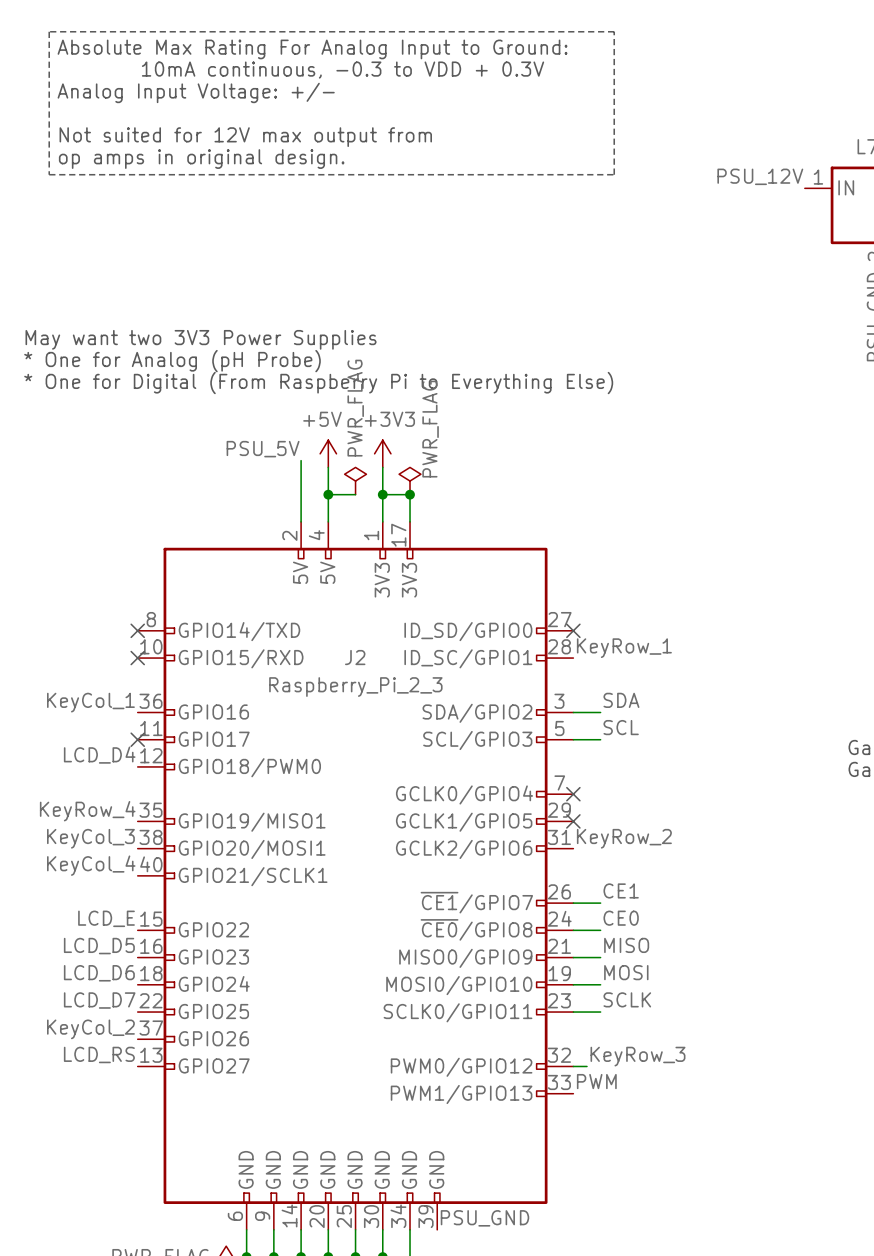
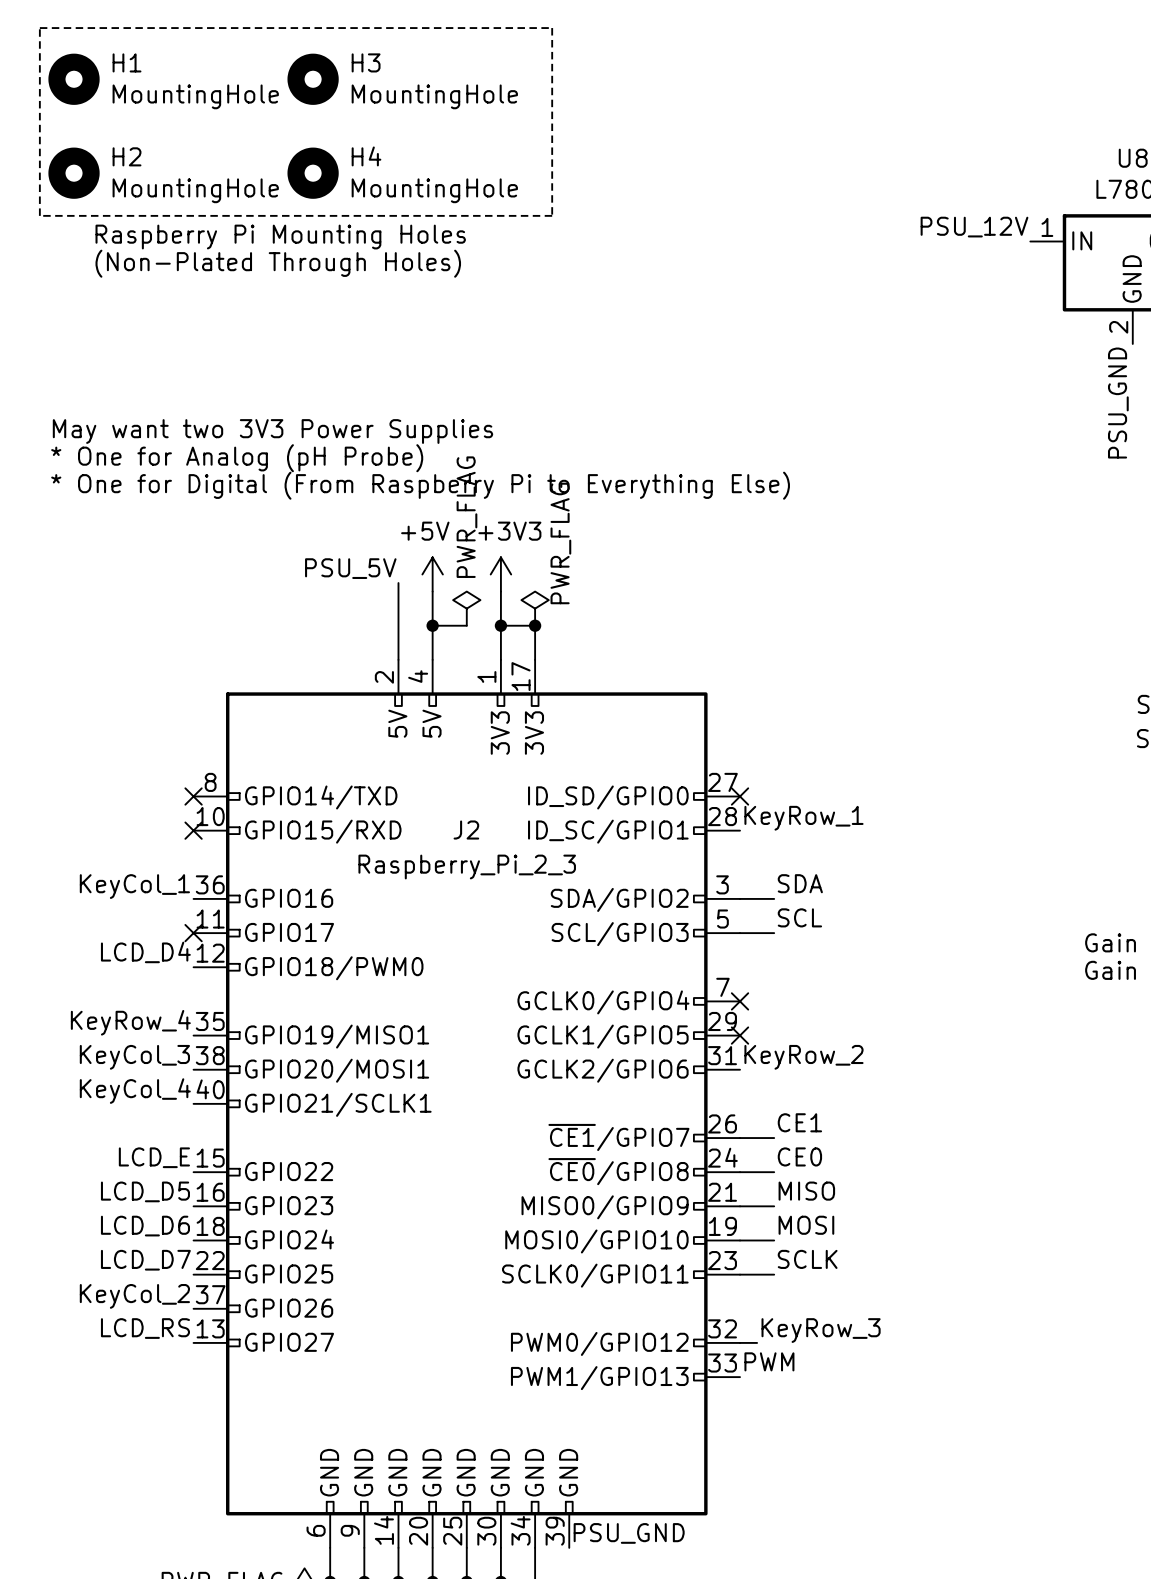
line: (49, 31) (49, 174) (614, 174) (614, 31) (49, 31) -> (39, 28) (39, 215) (552, 215) (552, 28) (39, 28)
text: Absolute Max Rating For Analog Input to Ground: (312, 49) -> none
H1: none -> MountingHole (74, 79)
H3: none -> MountingHole (313, 79)
text: 10mA continuous, -0.3 to VDD + 0.3V (343, 70) -> none
text: Analog Input Voltage: +/- (196, 92) -> none
H2: none -> MountingHole (74, 173)
H4: none -> MountingHole (313, 173)
text: Not suited for 12V max output from (245, 137) -> none
text: op amps in original design. (201, 159) -> none
text: none -> Raspberry Pi Mounting Holes (280, 237)
text: none -> (Non-Plated Through Holes) (278, 263)

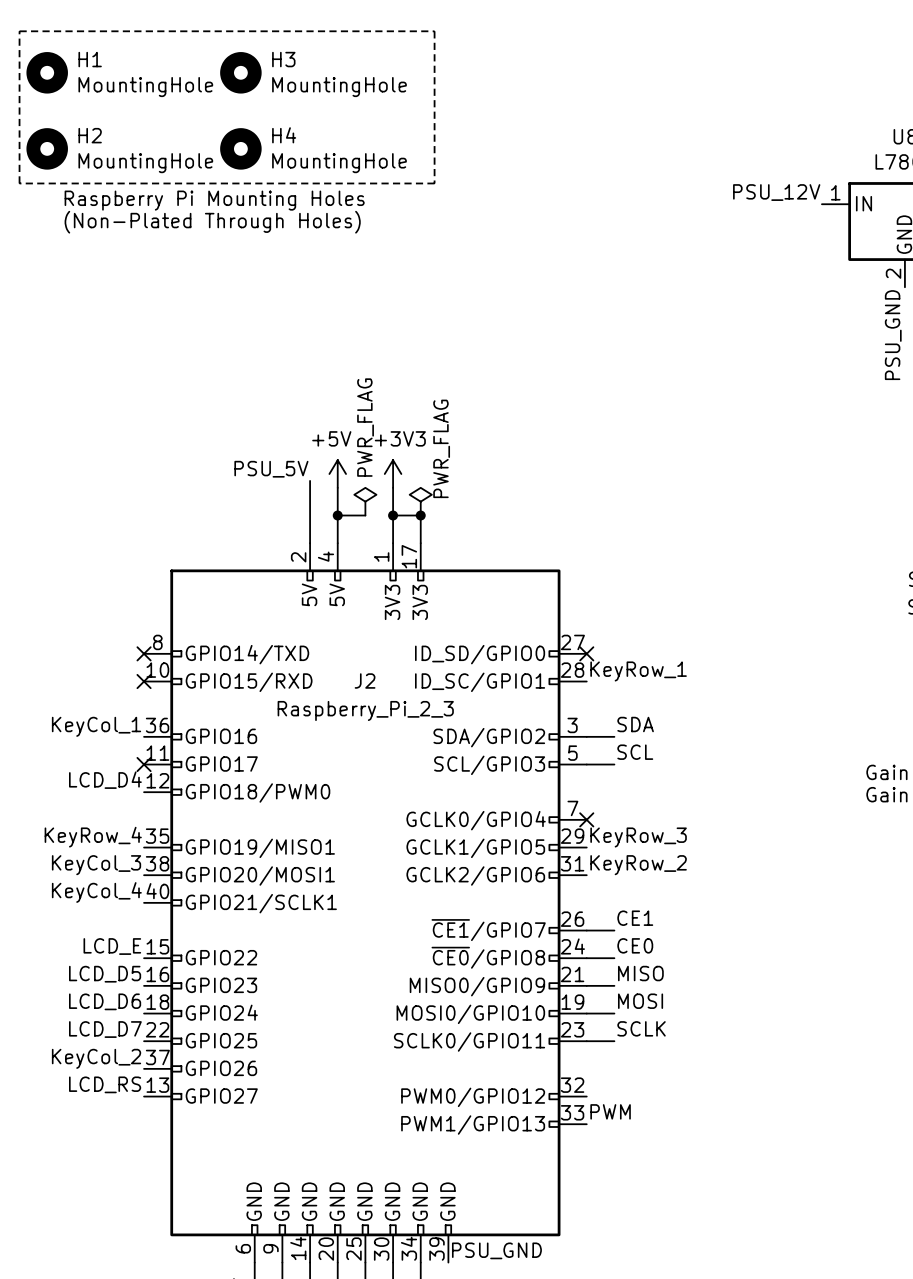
text: May want two 3V3 Power Supplies (272, 431) -> none
text: * One for Analog (pH Probe) (237, 458) -> none
text: * One for Digital (From Raspberry Pi to Everything Else) (420, 485) -> none
no-connect mark: (740, 1035) -> none
label position: KeyRow_3 (821, 1330) -> KeyRow_3 (638, 837)
wire: (740, 1342) (757, 1342) -> none

